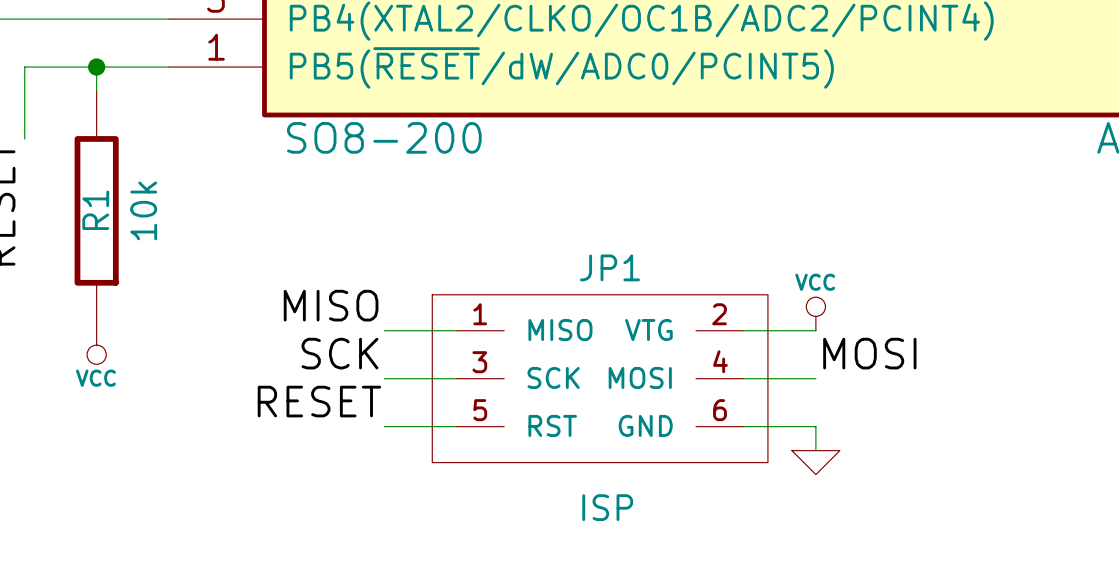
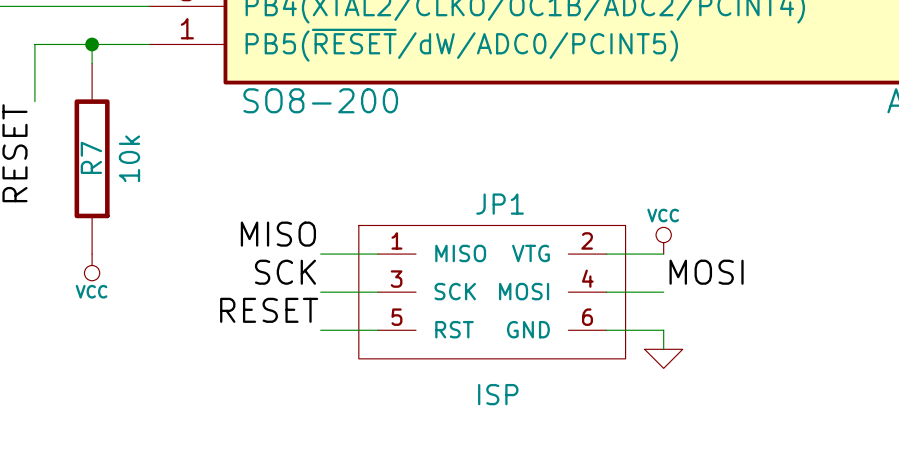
R1 name: R1 (95, 210) -> R7 (91, 157)

